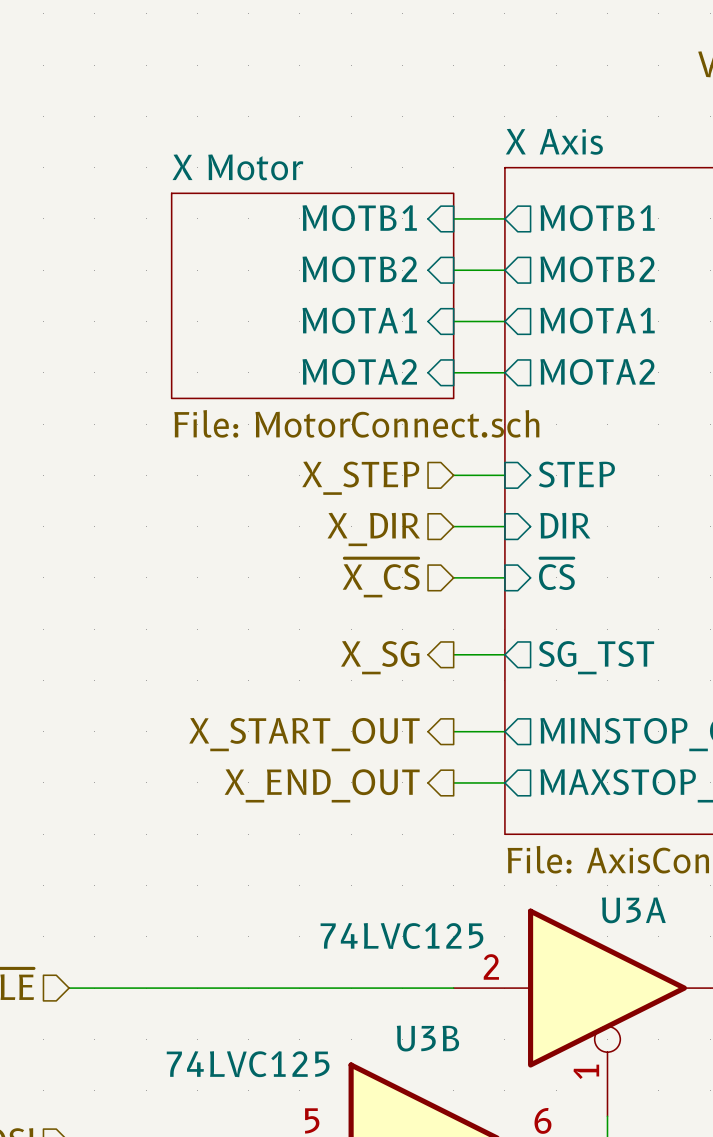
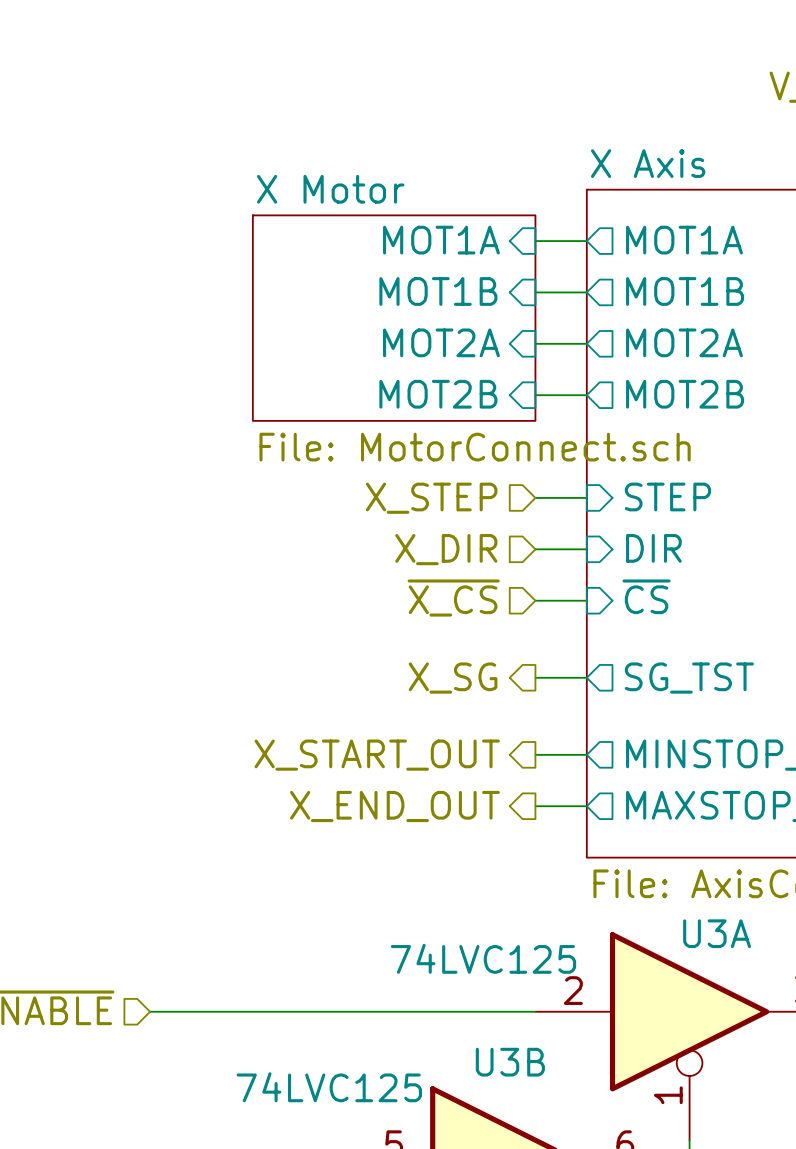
sheet pin: MOTB1 (359, 218) -> MOT1A (441, 240)
sheet pin: MOTB1 (597, 218) -> MOT1A (684, 240)
sheet pin: MOTB2 (359, 269) -> MOT1B (438, 291)
sheet pin: MOTB2 (597, 269) -> MOT1B (685, 291)
sheet pin: MOTA1 (359, 320) -> MOT2A (441, 342)
sheet pin: MOTA1 (597, 320) -> MOT2A (684, 342)
sheet pin: MOTA2 (359, 371) -> MOT2B (438, 394)
sheet pin: MOTA2 (597, 371) -> MOT2B (685, 394)

